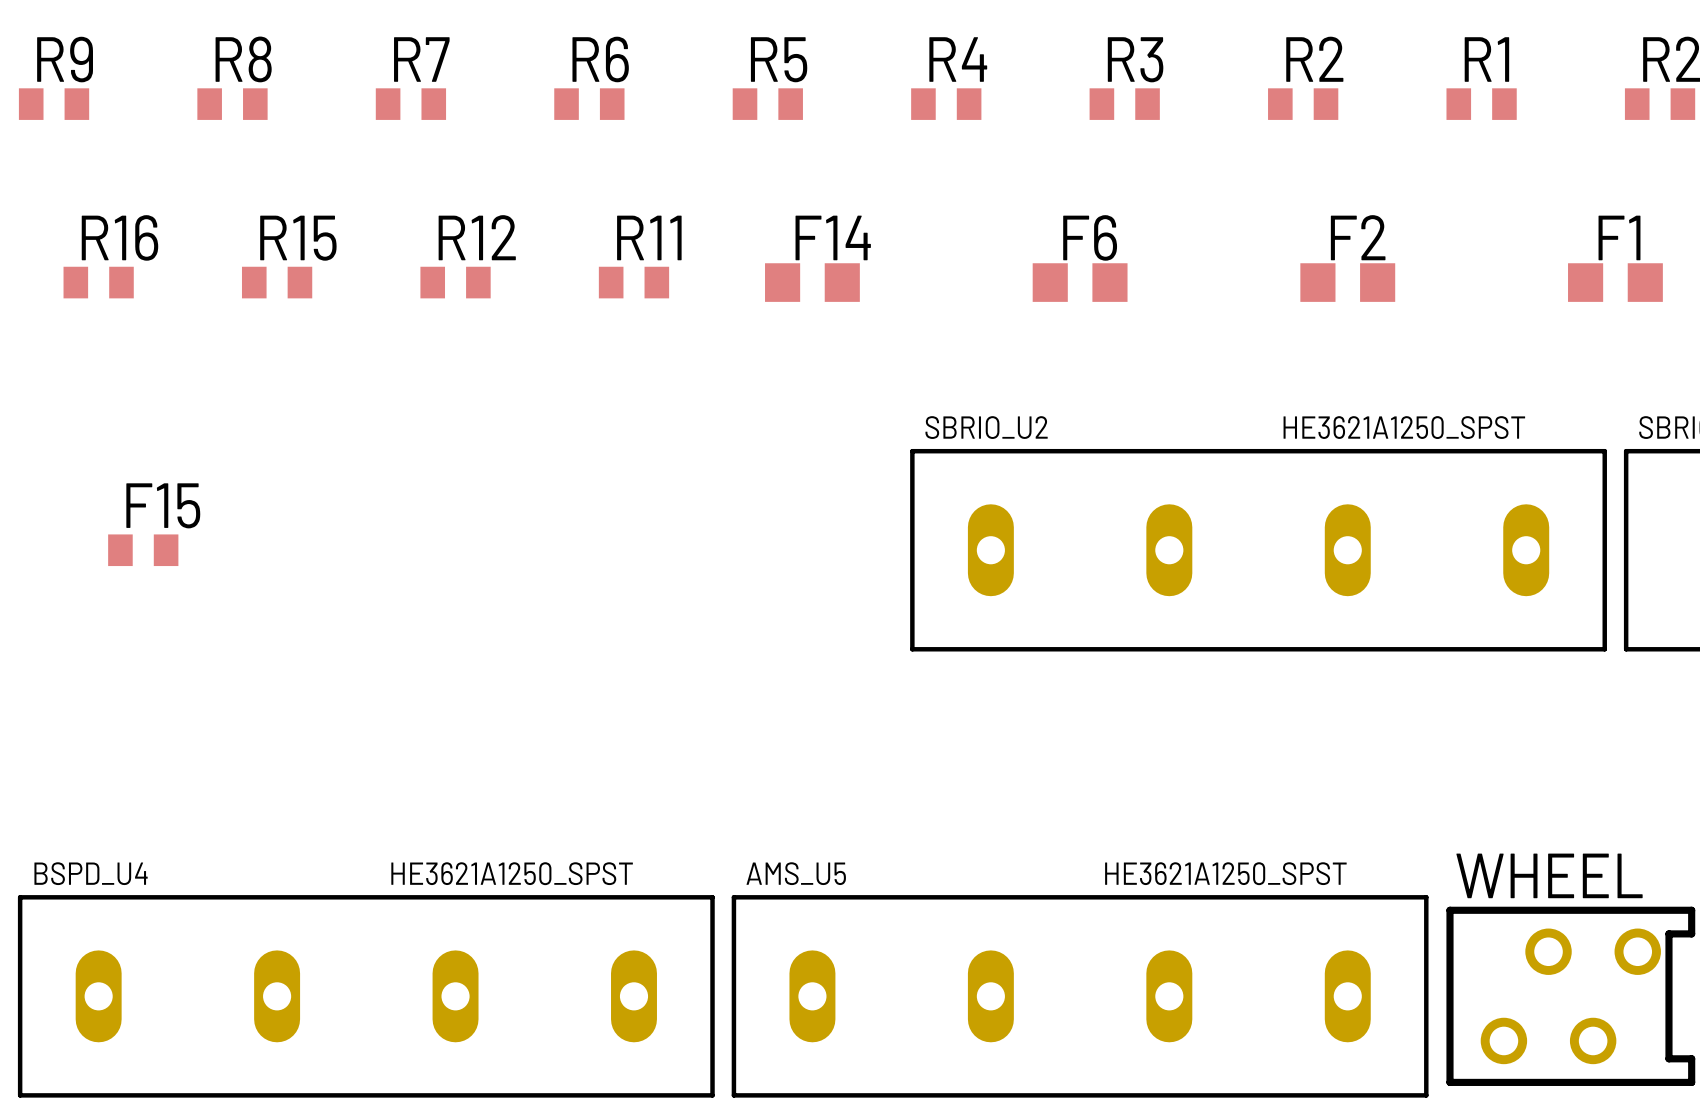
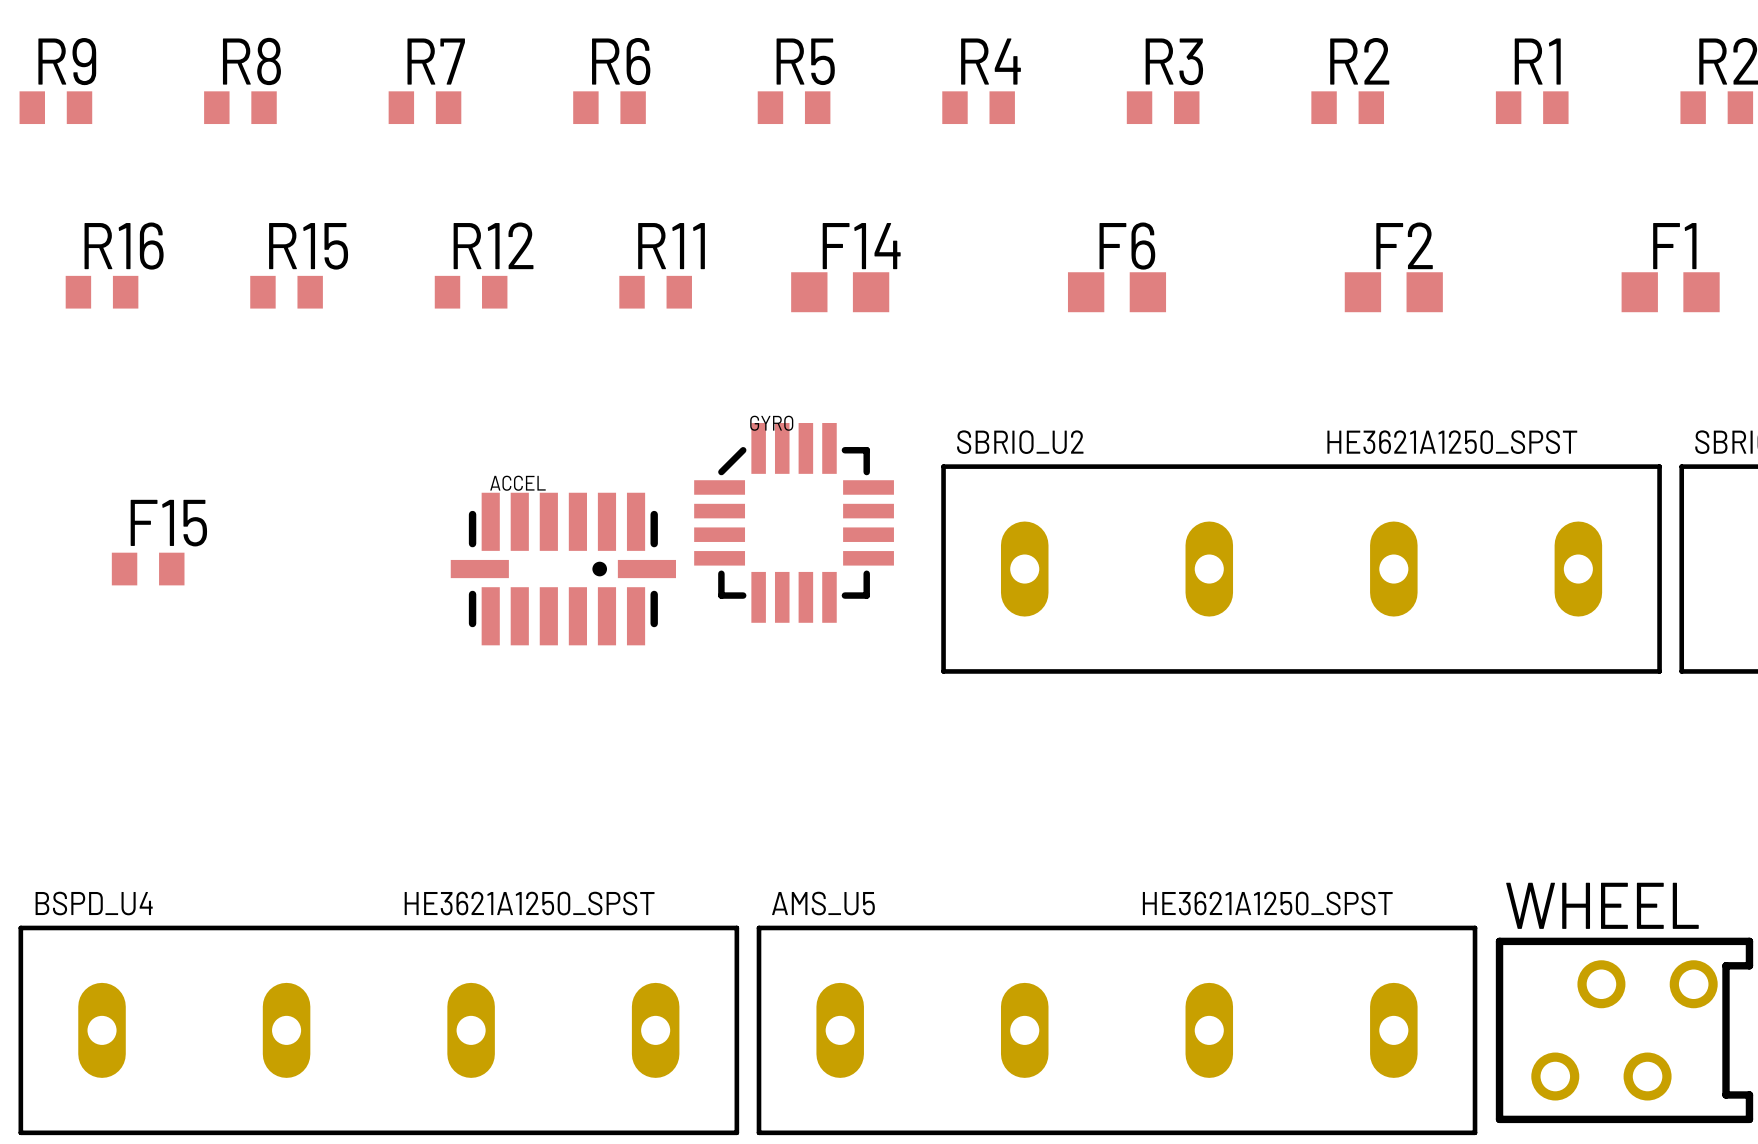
GYRO: none -> (794, 522)
ACCEL: none -> (563, 569)

